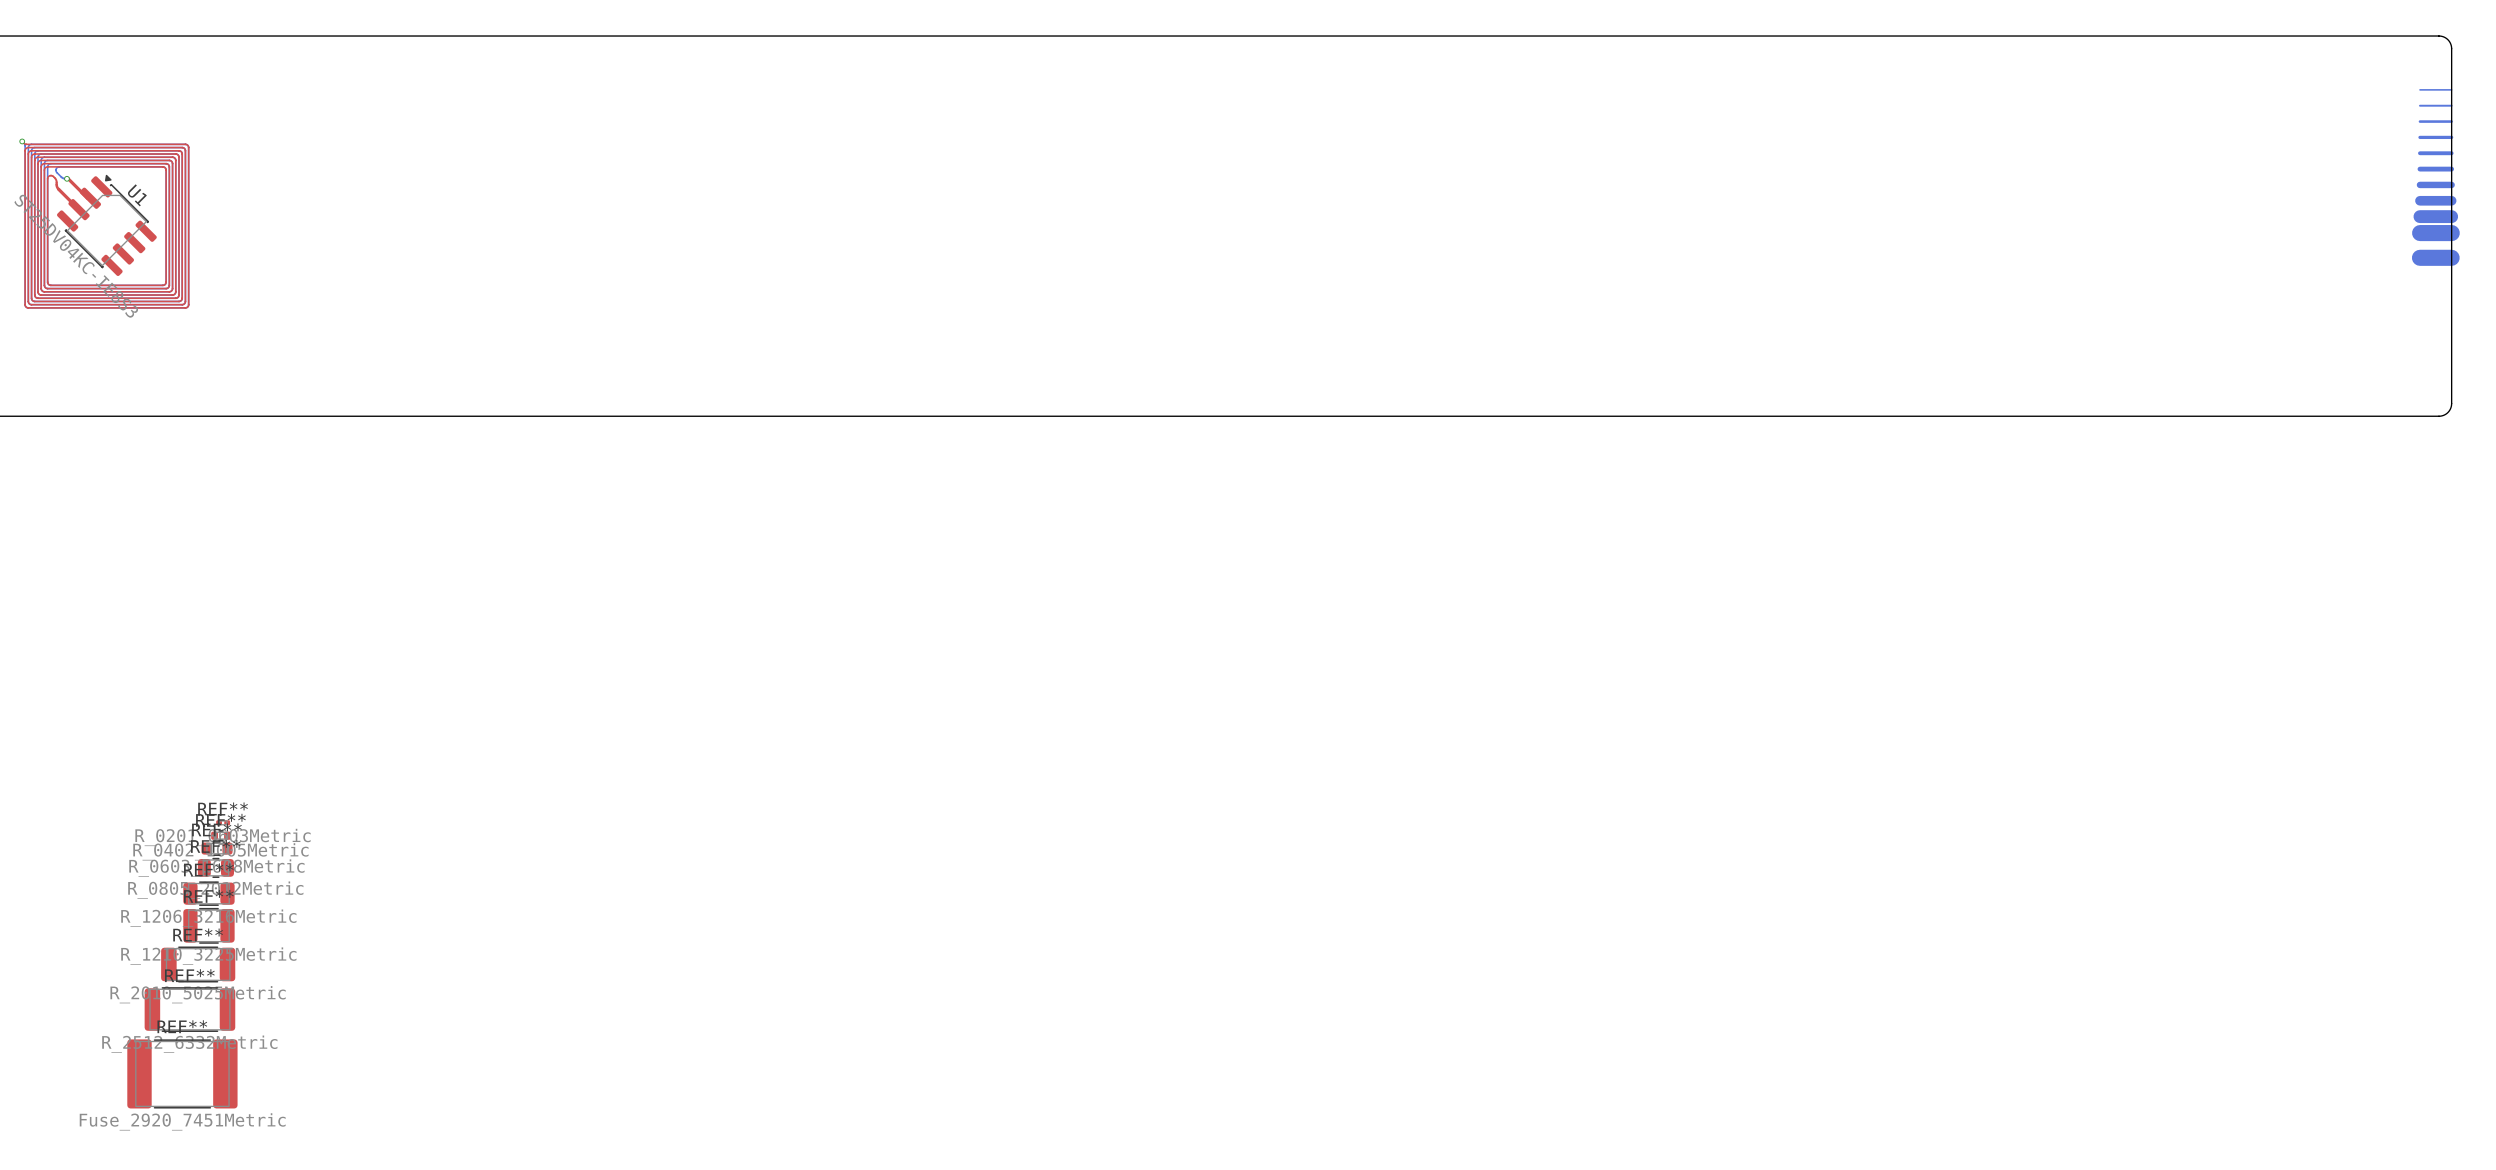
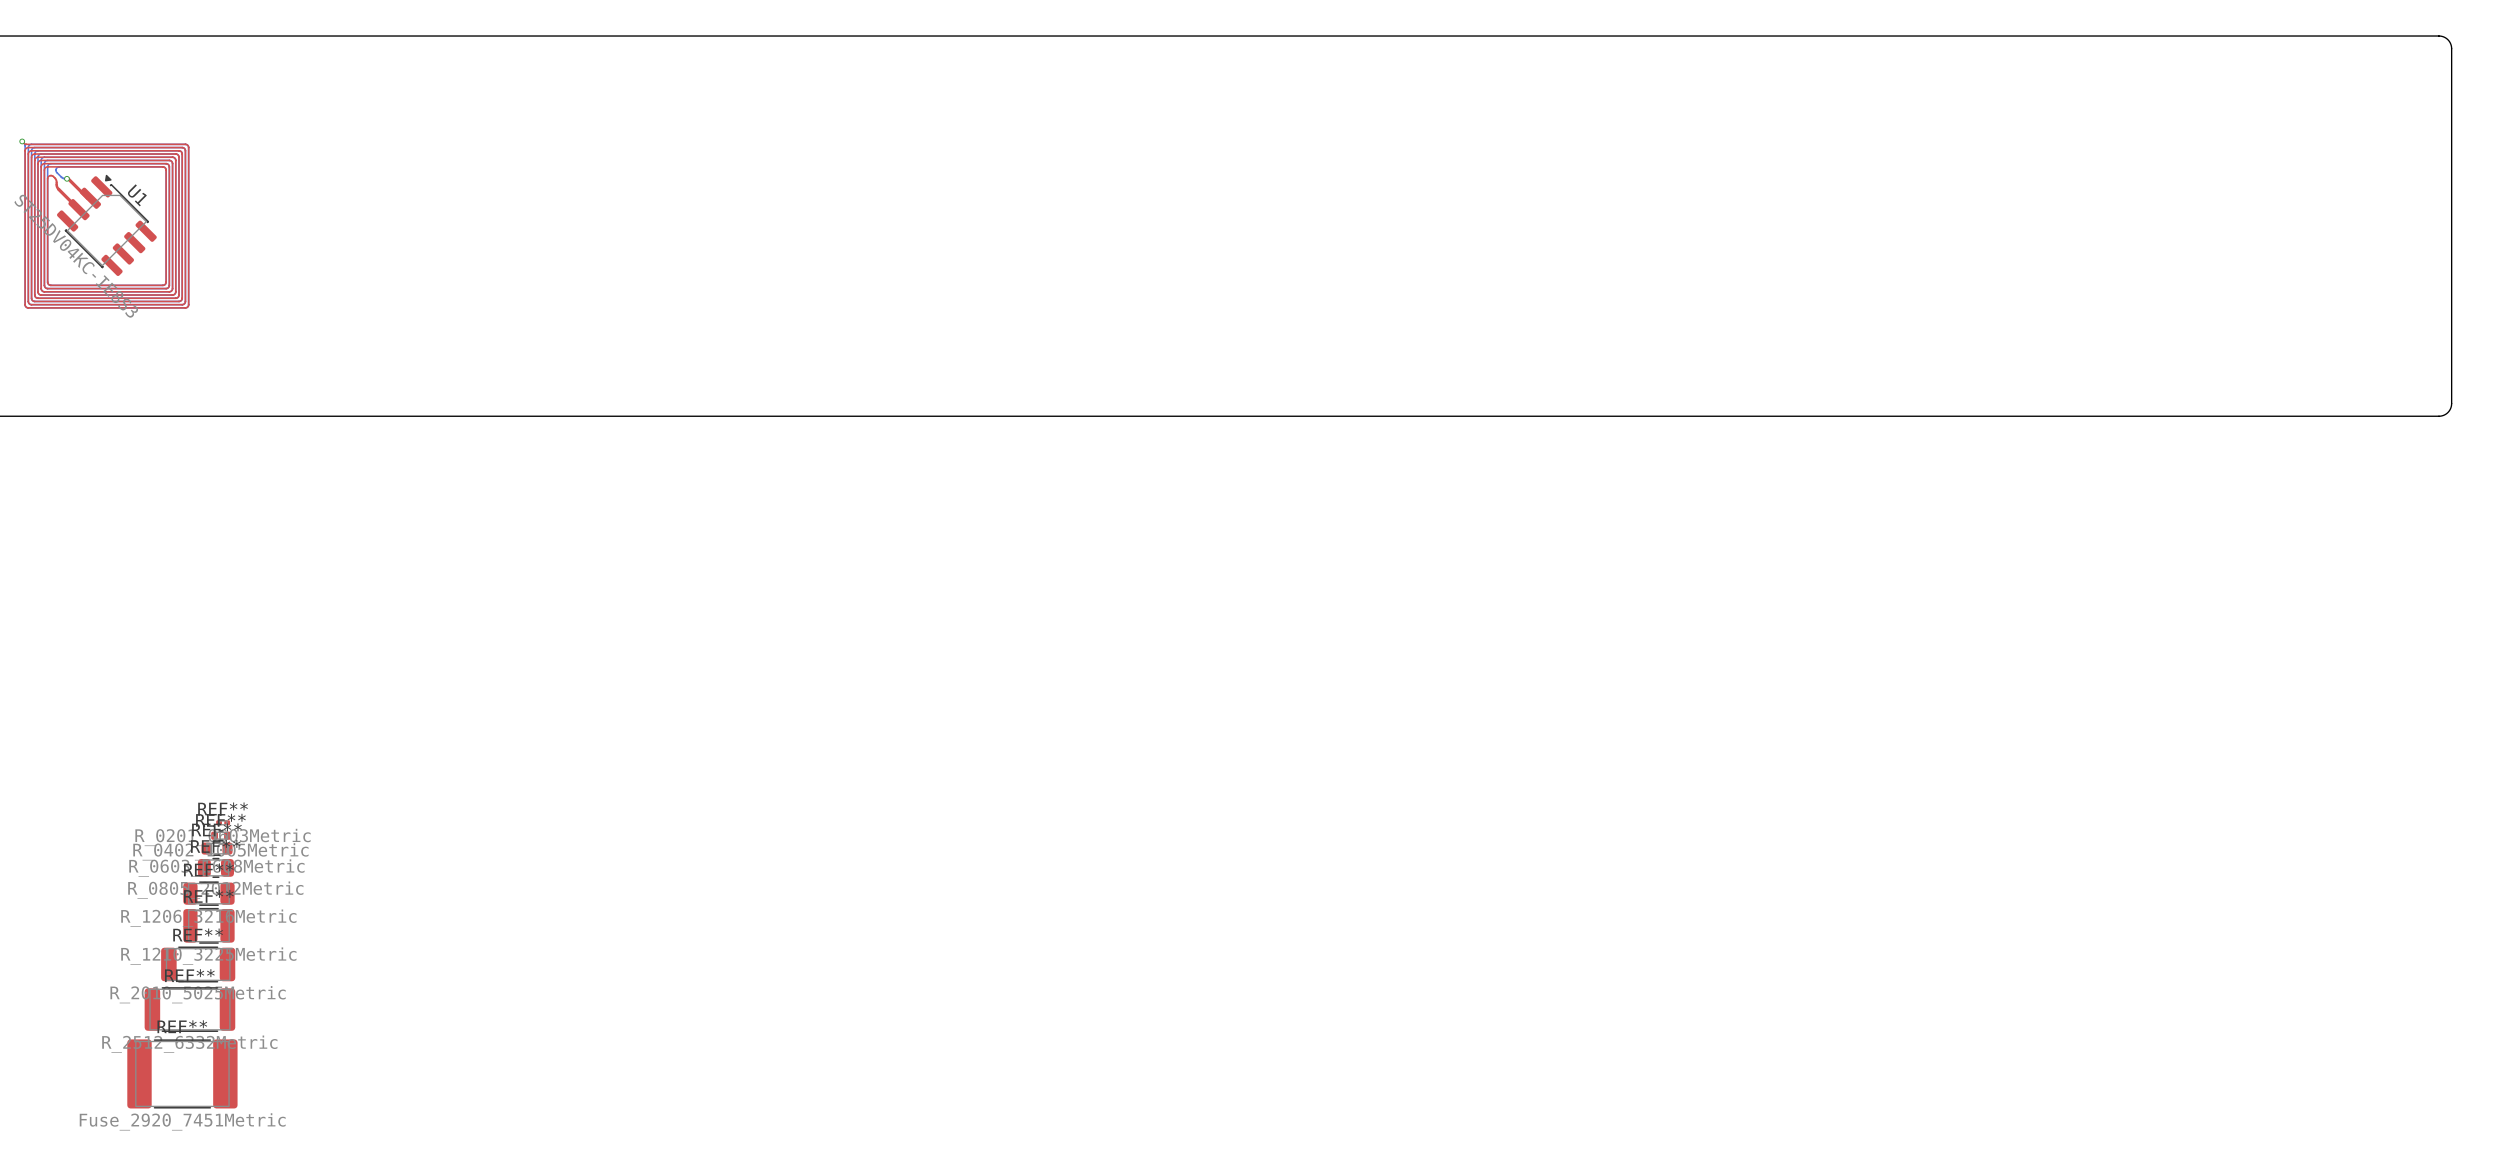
bottom track: (2419, 89) (2451, 89) -> none
bottom track: (2419, 105) (2451, 105) -> none
bottom track: (2419, 121) (2451, 121) -> none
bottom track: (2419, 137) (2451, 137) -> none
bottom track: (2419, 153) (2451, 153) -> none
bottom track: (2419, 169) (2451, 169) -> none
bottom track: (2419, 184) (2451, 184) -> none
bottom track: (2419, 200) (2451, 200) -> none
bottom track: (2419, 216) (2451, 216) -> none
bottom track: (2420, 233) (2451, 233) -> none
bottom track: (2419, 257) (2451, 257) -> none

